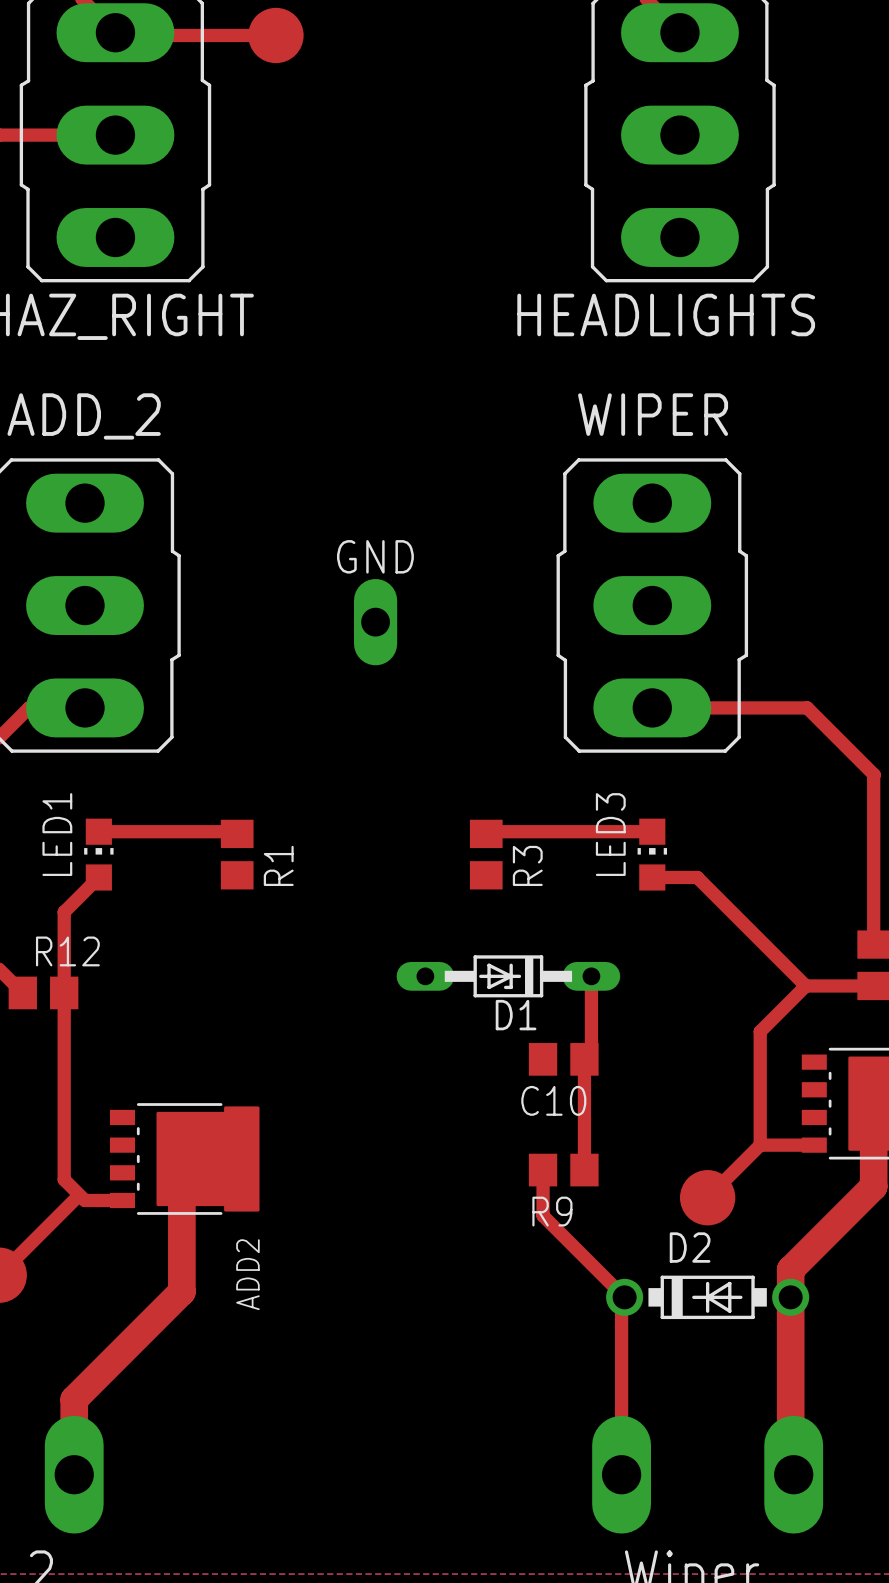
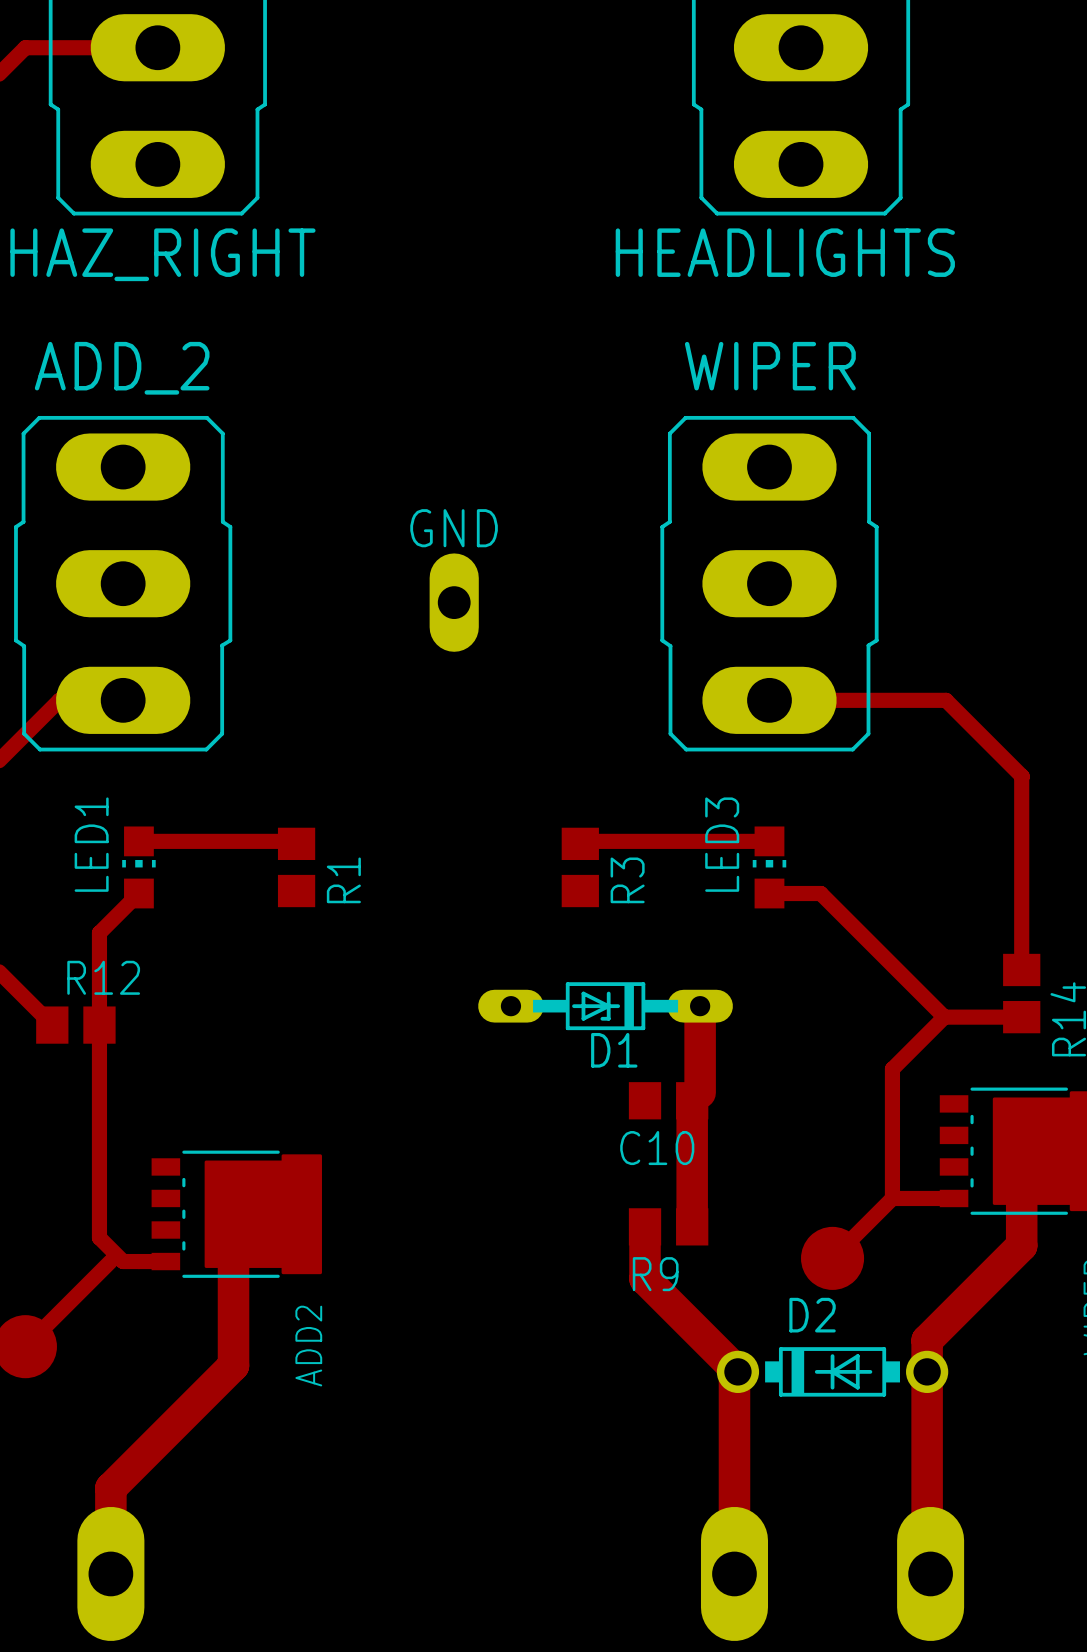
top track width: thin (591, 976) (591, 1052) -> thick (700, 1006) (700, 1092)
top track width: thin (584, 1059) (584, 1170) -> thick (692, 1100) (692, 1226)
top track width: thin (543, 1170) (543, 1215) (624, 1297) -> thick (645, 1226) (645, 1278) (737, 1371)
top track width: thin (621, 1300) (621, 1474) -> thick (734, 1375) (734, 1573)

